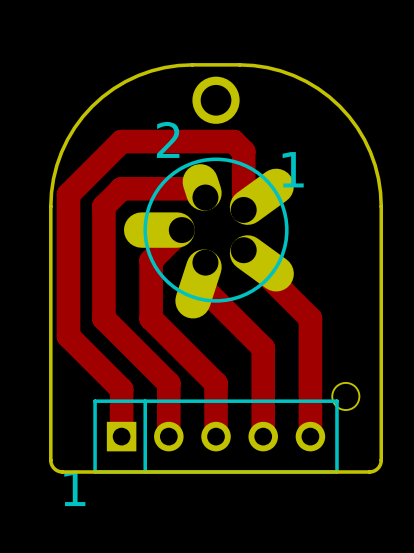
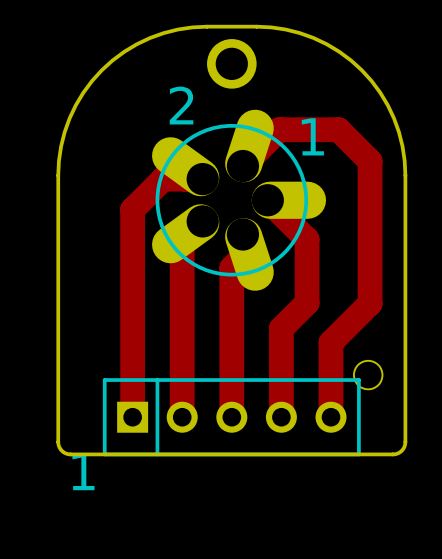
part footprint: [123, 76, 294, 319] -> [152, 39, 327, 291]
track: (205, 197) (196, 188) (121, 188) (103, 206) (103, 318) (168, 383) -> (202, 221) (182, 241) (182, 361)
track: (243, 209) (243, 151) (233, 141) (121, 141) (68, 194) (68, 336) (121, 389) -> (202, 179) (163, 179) (132, 209) (132, 367)
track: (181, 230) (151, 260) (151, 318) (216, 383) -> (242, 234) (242, 256) (231, 267) (231, 361)
track: (243, 250) (310, 318) (310, 365) -> (242, 166) (279, 129) (338, 129) (370, 161) (370, 303) (331, 342)
track: (205, 262) (205, 290) (263, 348) (263, 352) -> (267, 200) (307, 239) (307, 302) (281, 328)

